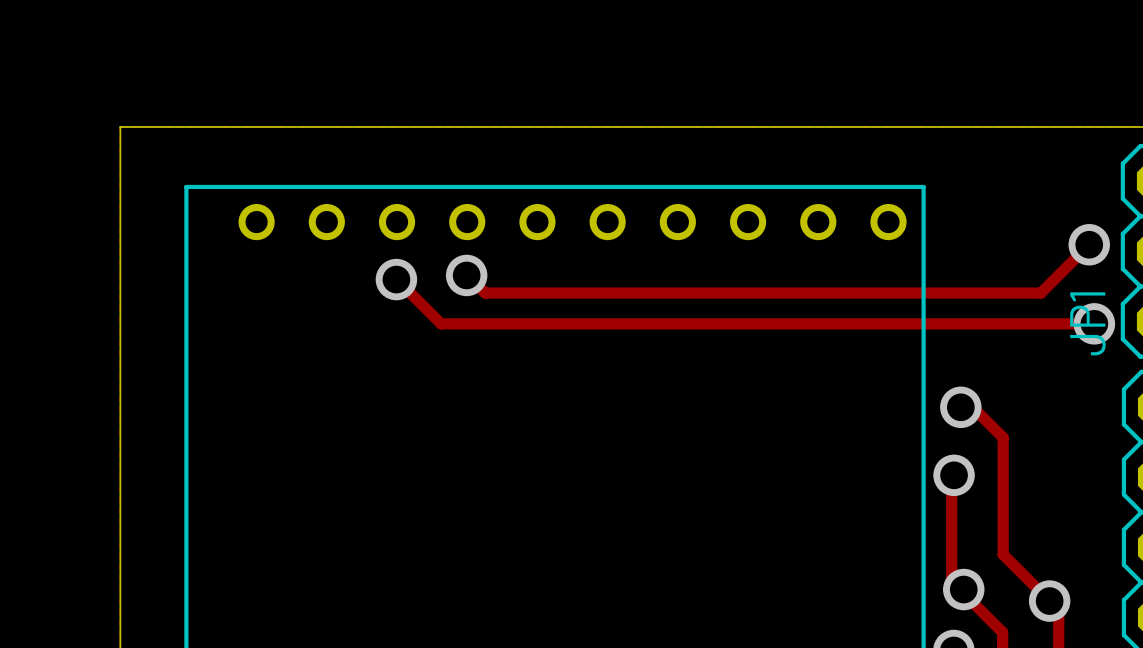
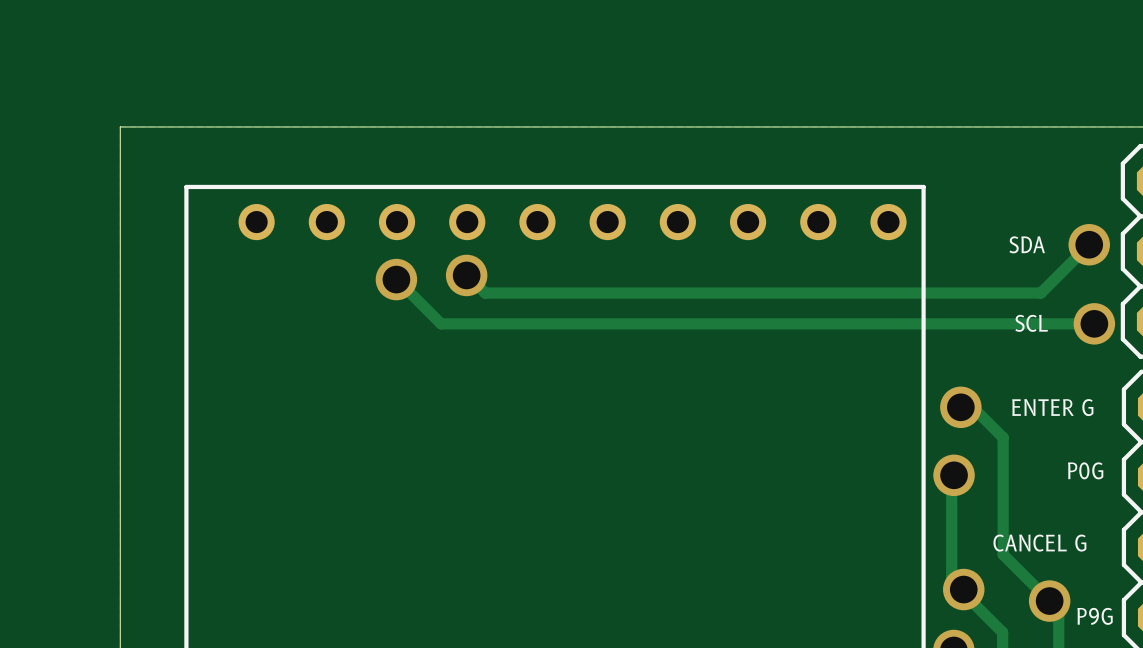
text: none -> SDA (1027, 244)
text: none -> SCL (1031, 323)
JP1 name: JP1 (1087, 323) -> none
text: none -> ENTER G (1052, 407)
text: none -> P0G (1085, 470)
text: none -> CANCEL G (1039, 543)
text: none -> P9G (1095, 616)

